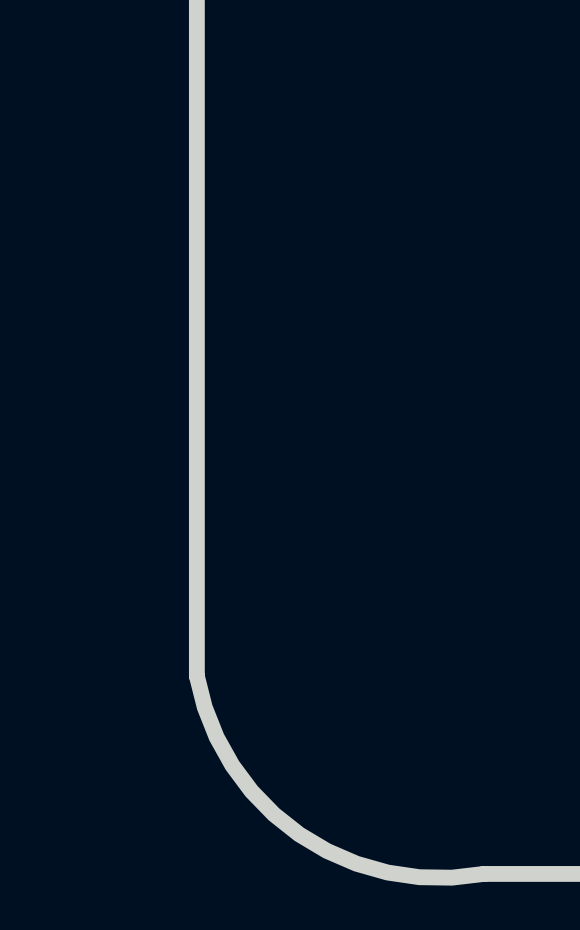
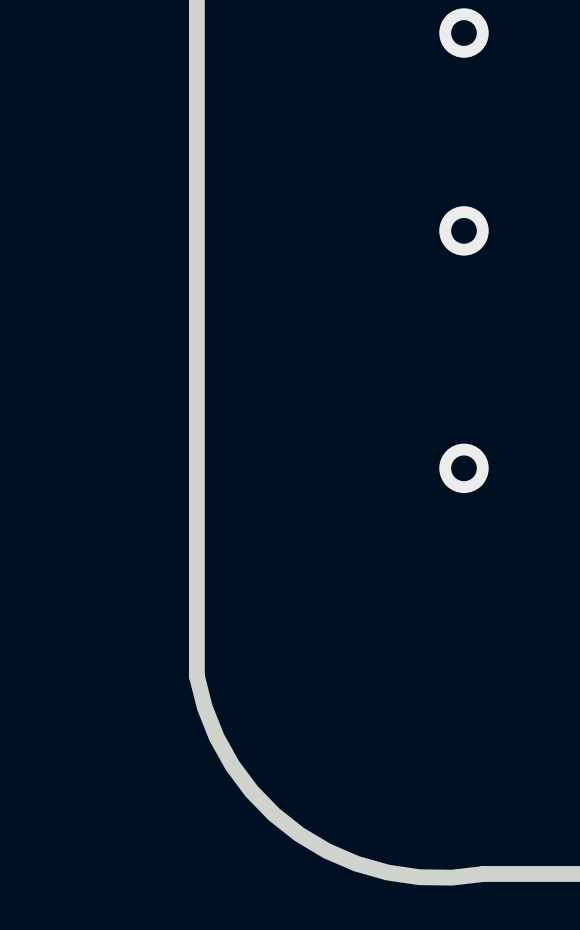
via: none -> (463, 33)
via: none -> (463, 230)
via: none -> (463, 468)

